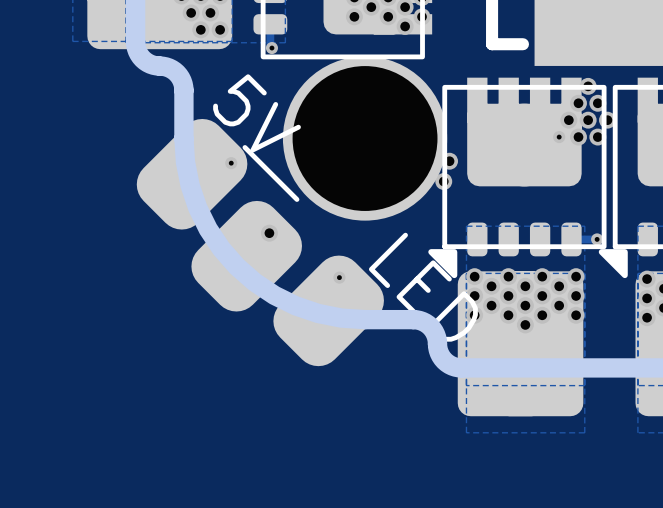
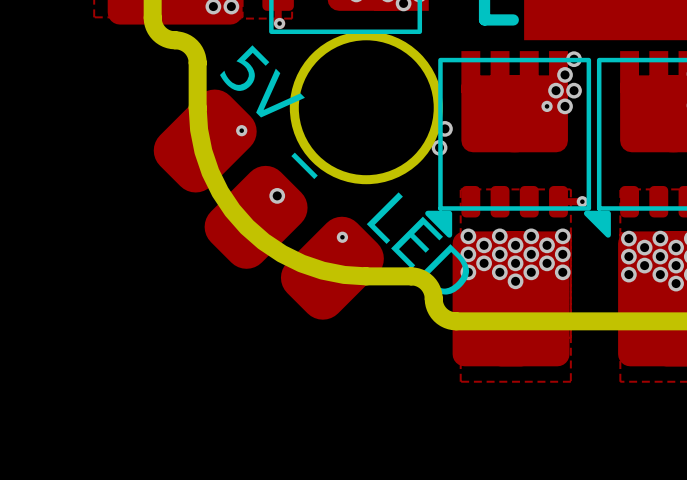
via: (597, 103) -> none
via: (607, 120) -> none
via: (597, 137) -> none

